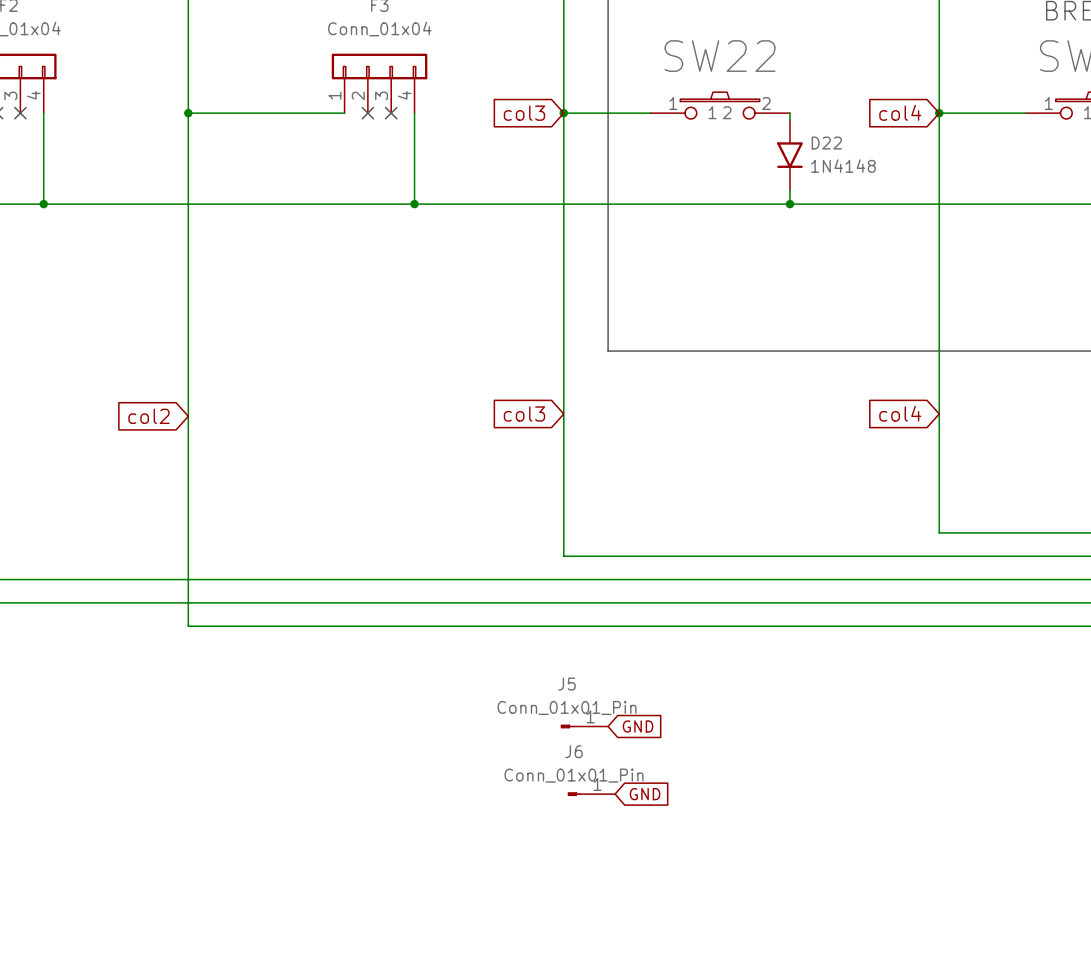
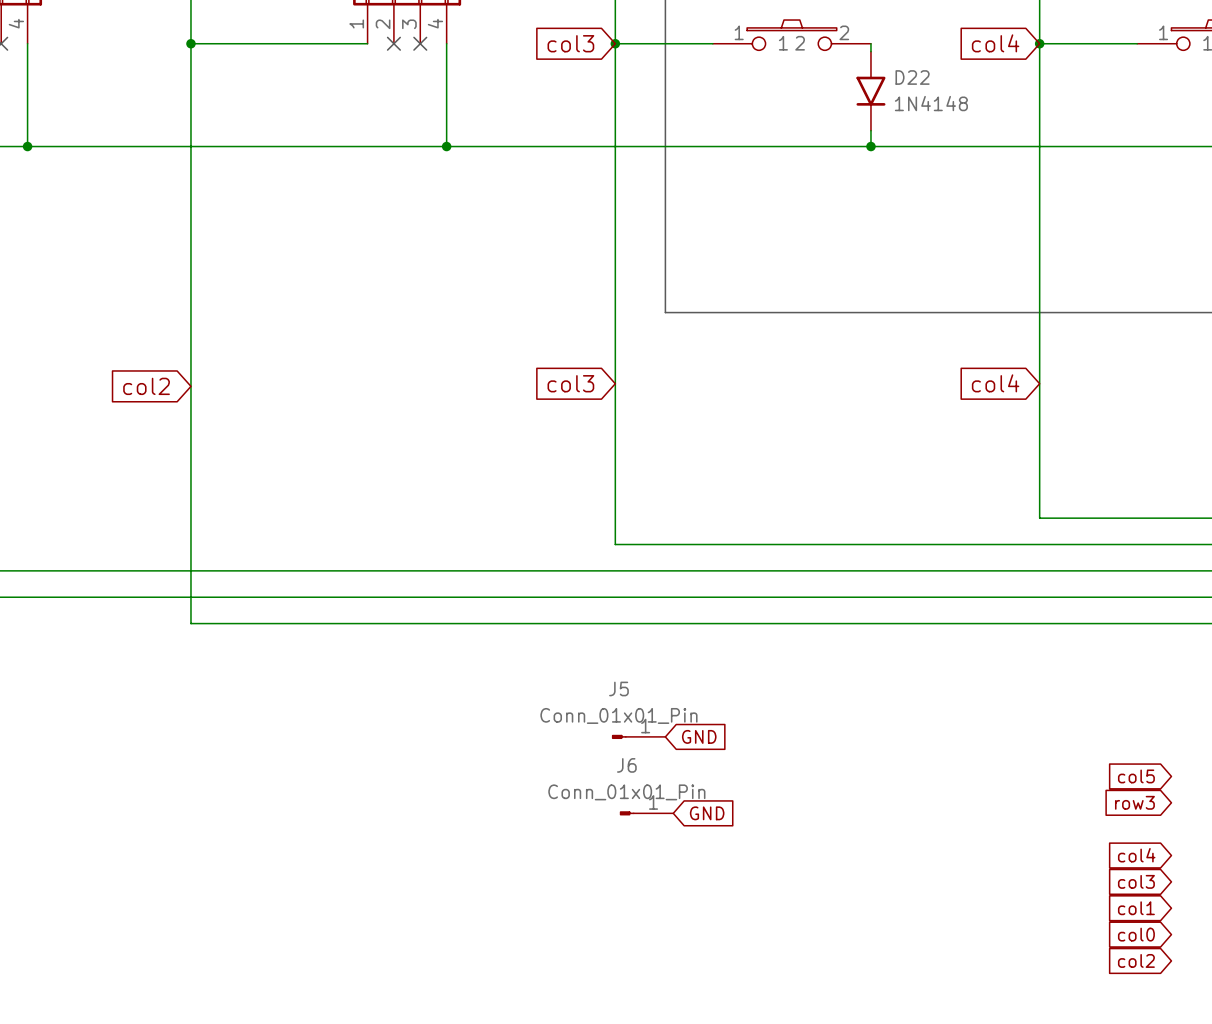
global label: none -> col5 (1136, 776)
global label: none -> row3 (1134, 802)
global label: none -> col4 (1136, 855)
global label: none -> col3 (1136, 881)
global label: none -> col1 (1136, 908)
global label: none -> col0 (1136, 934)
global label: none -> col2 (1136, 960)

